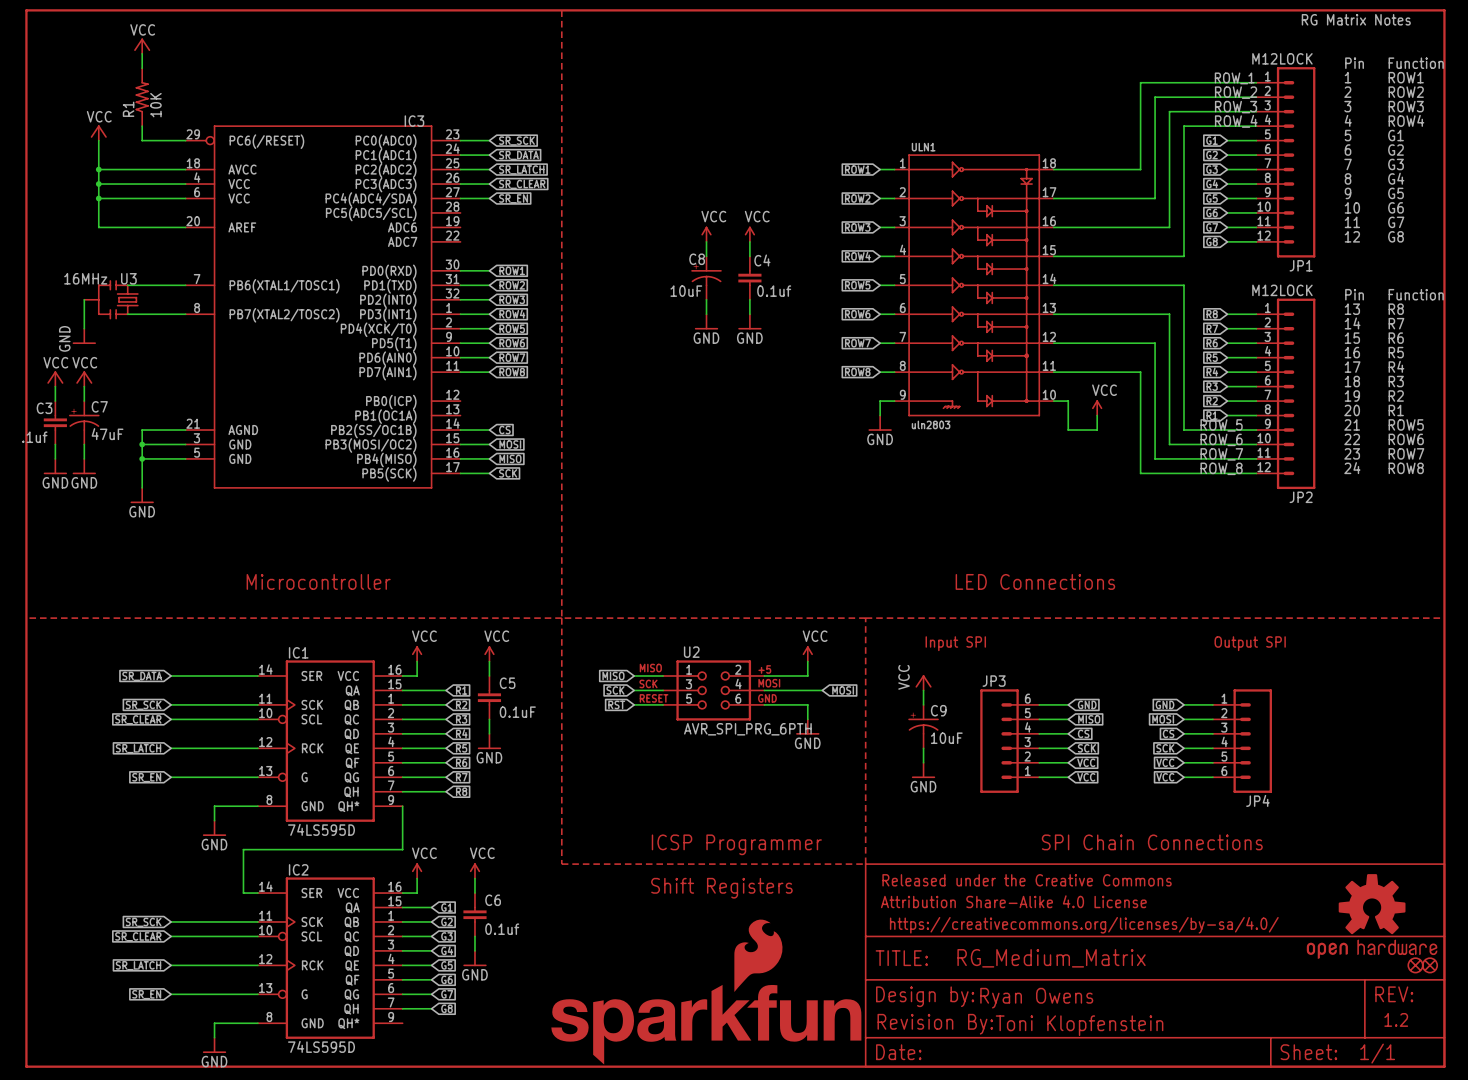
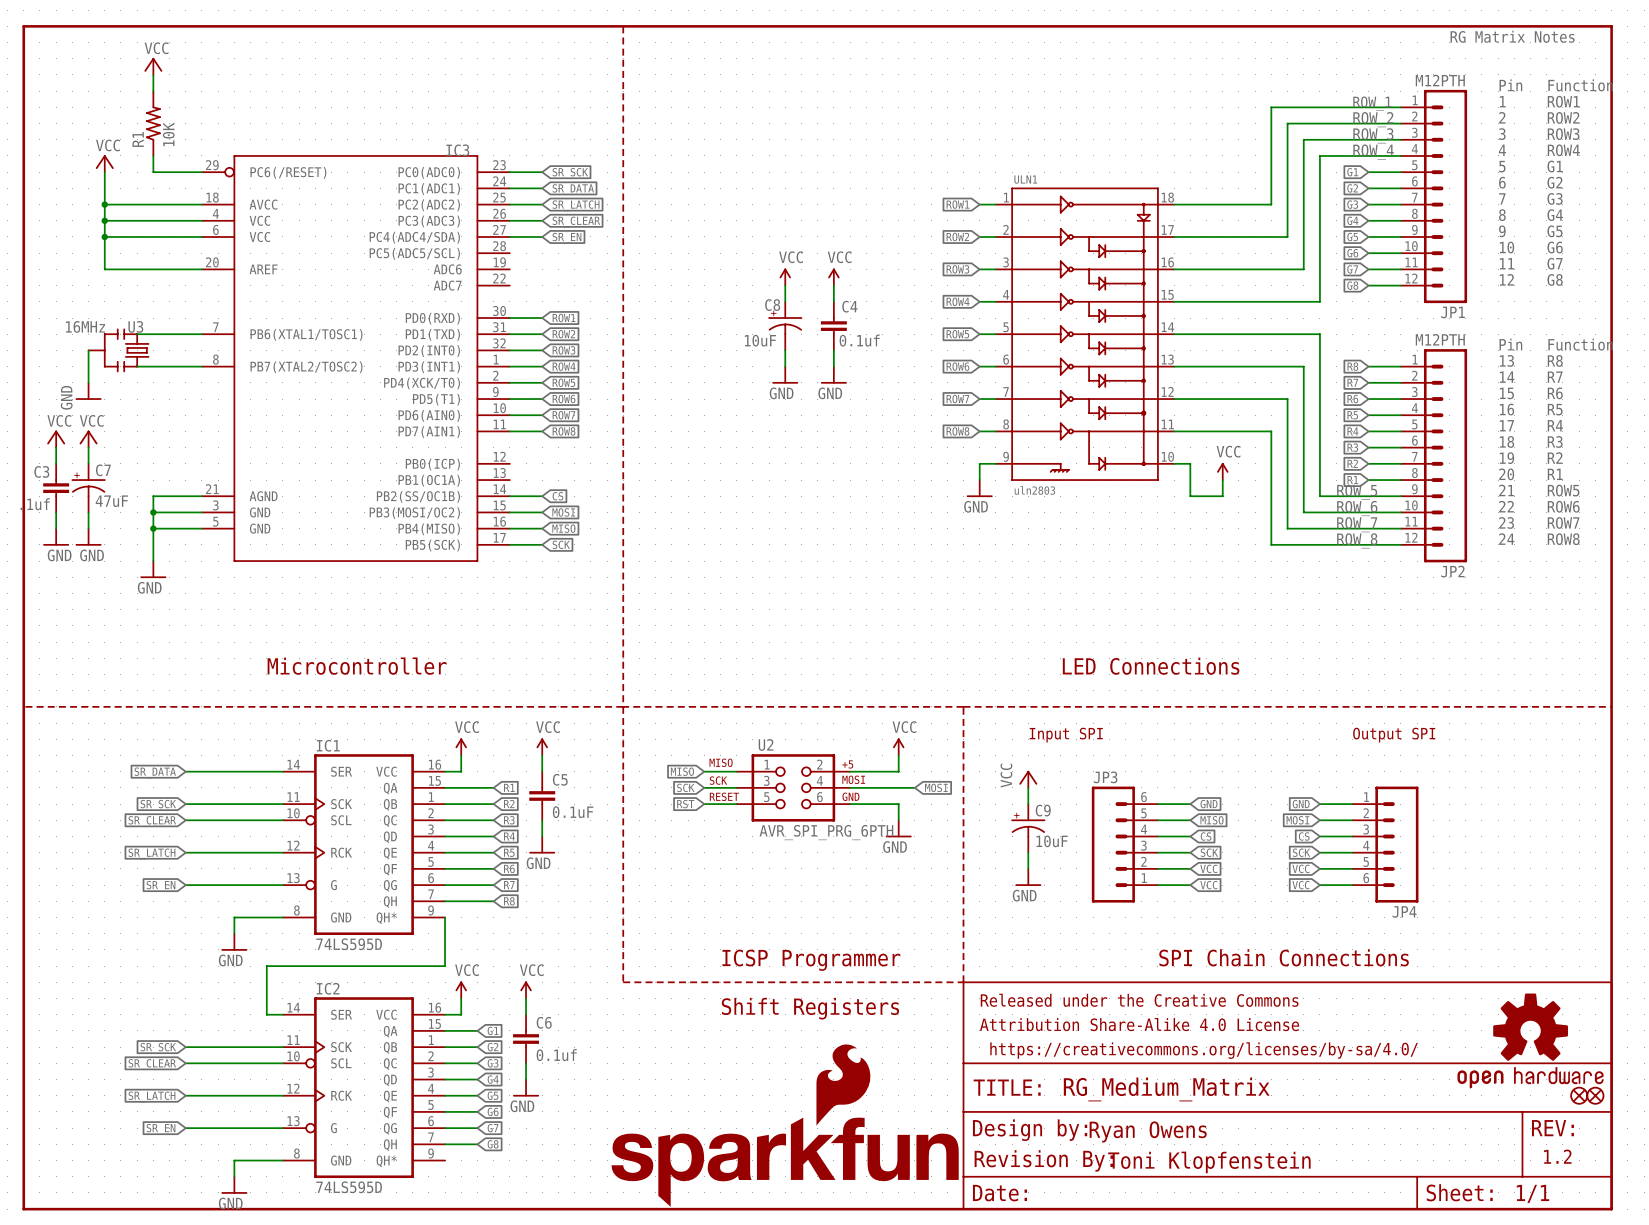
JP1 value: M12LOCK (1282, 58) -> M12PTH (1440, 80)
JP2 value: M12LOCK (1282, 290) -> M12PTH (1440, 339)

